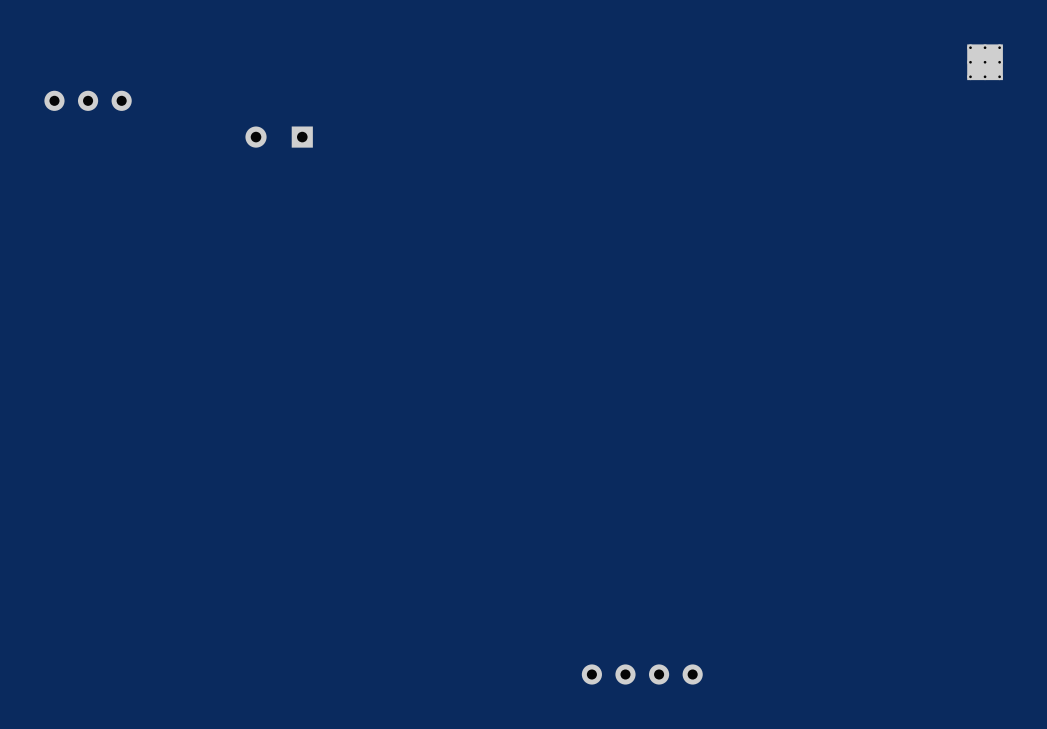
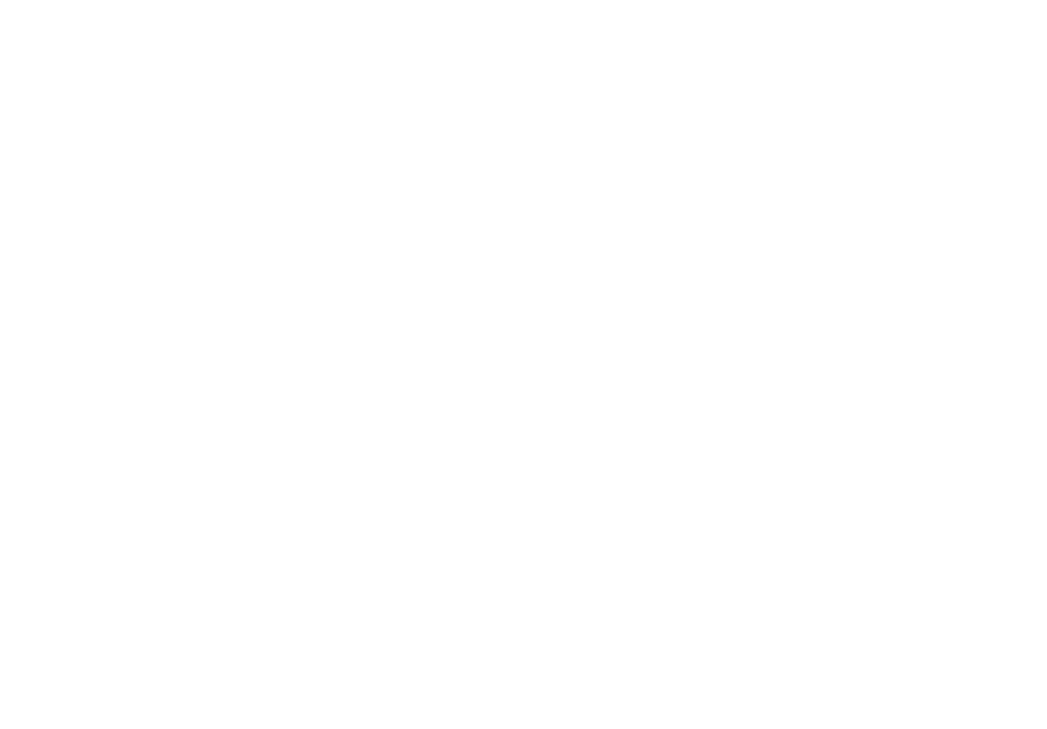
part: (985, 62) -> none
part: (88, 100) -> none
part: (279, 137) -> none
part: (642, 674) -> none

